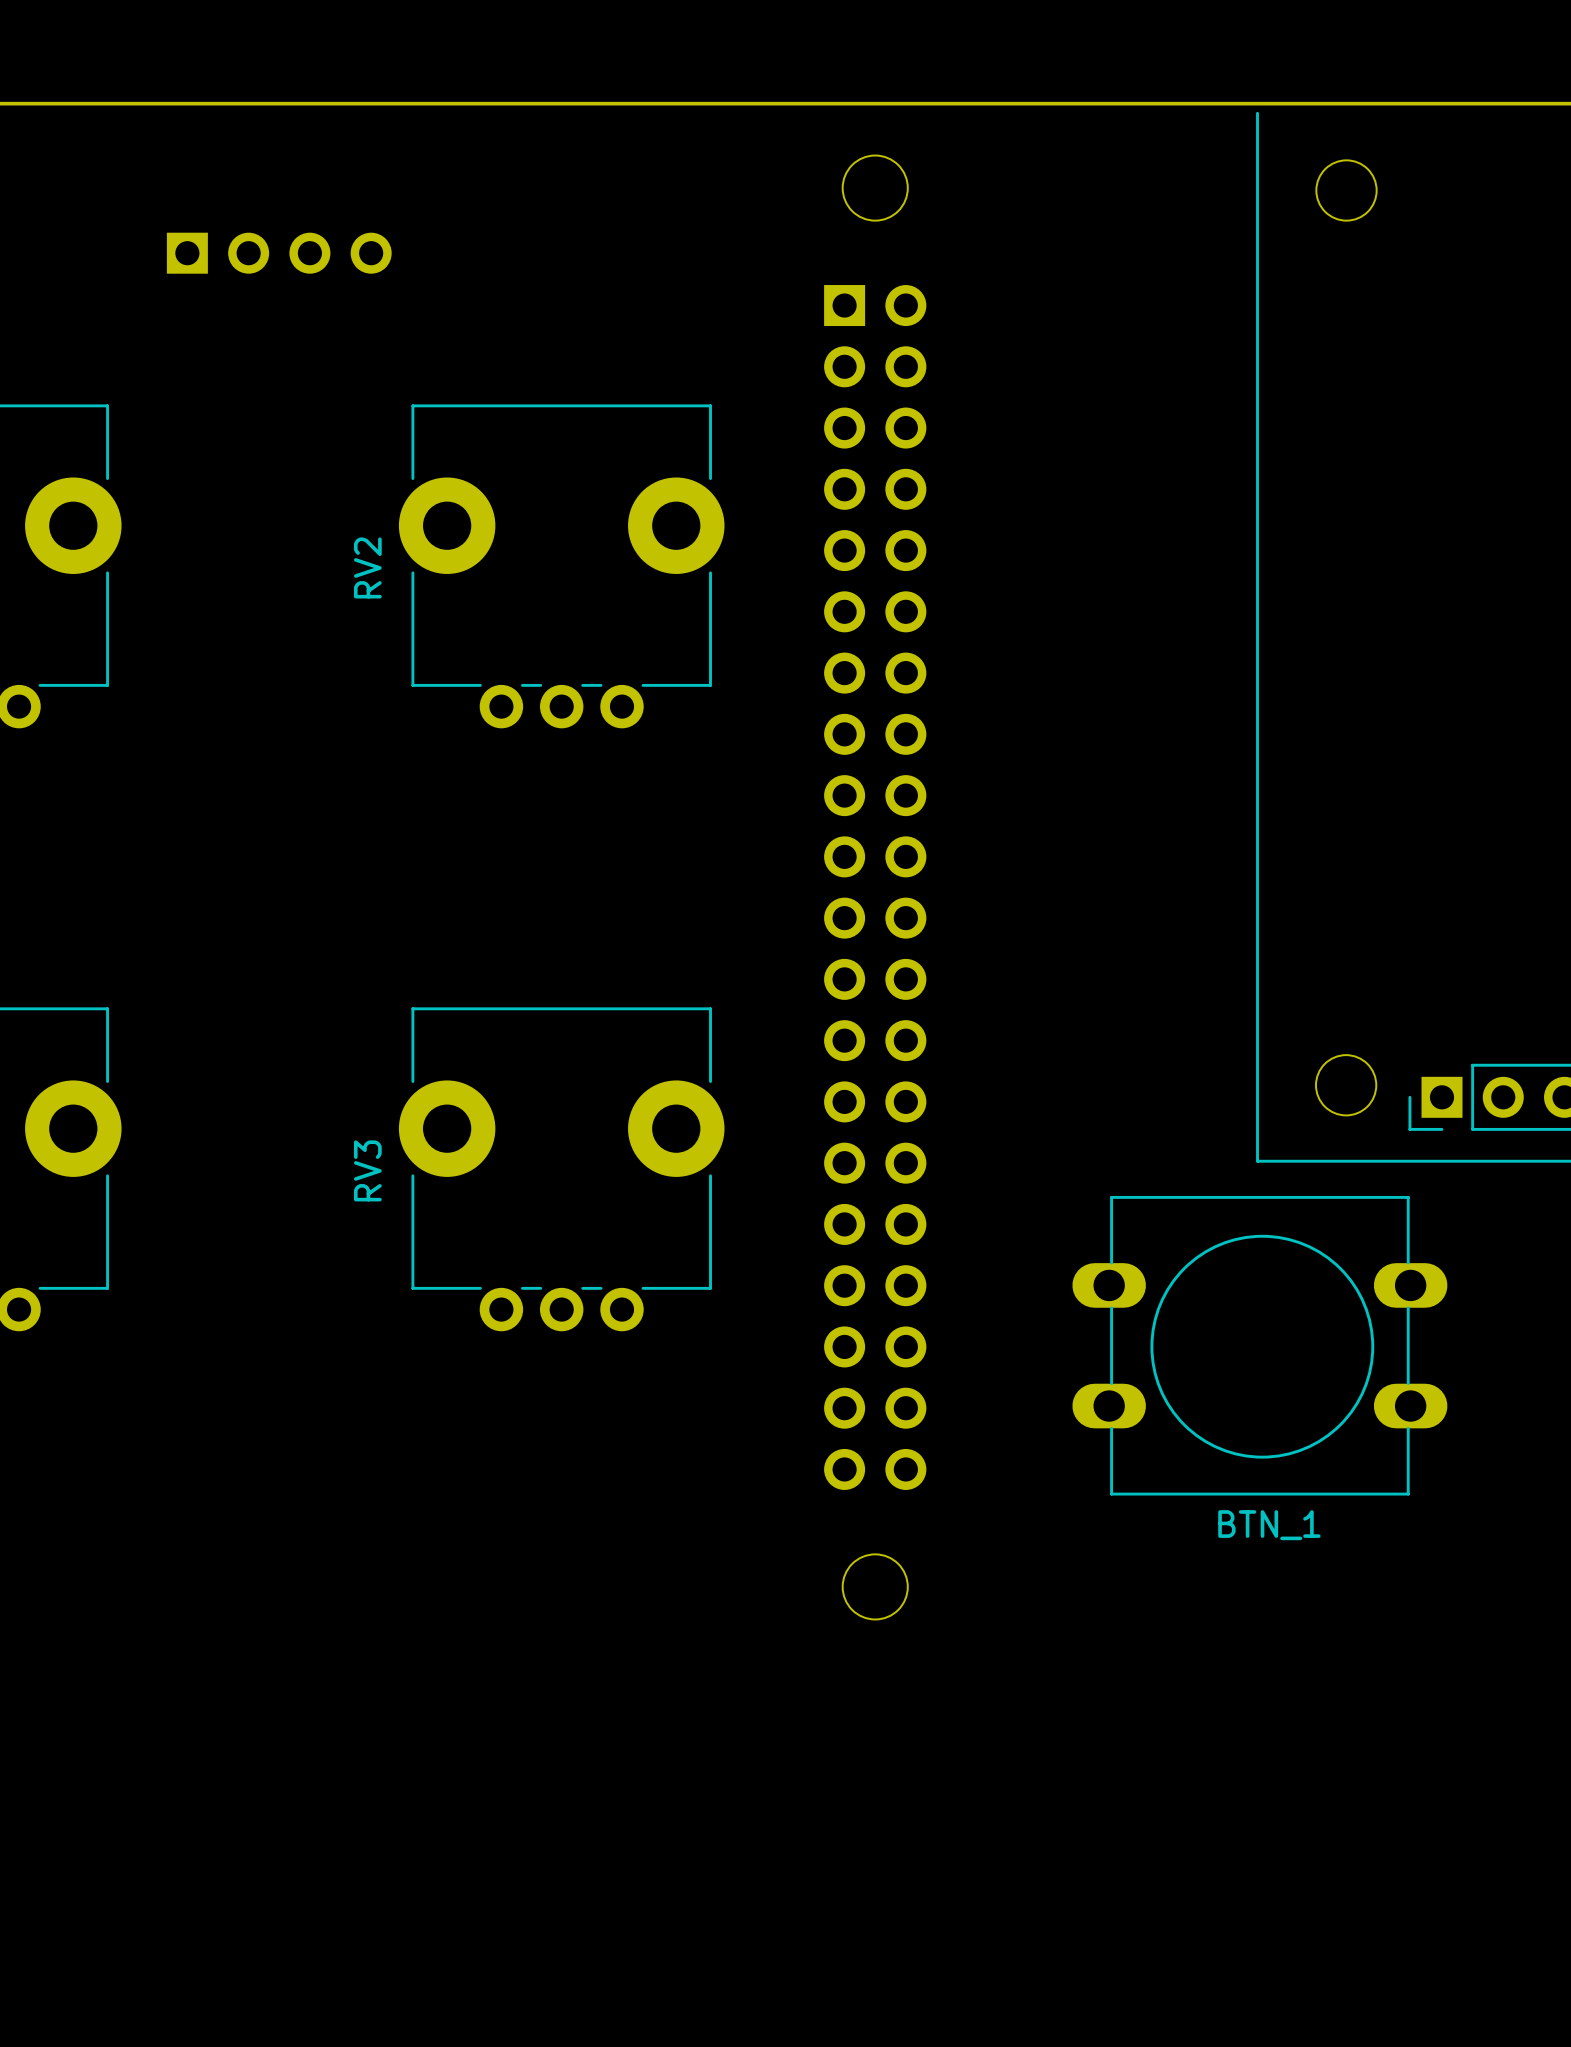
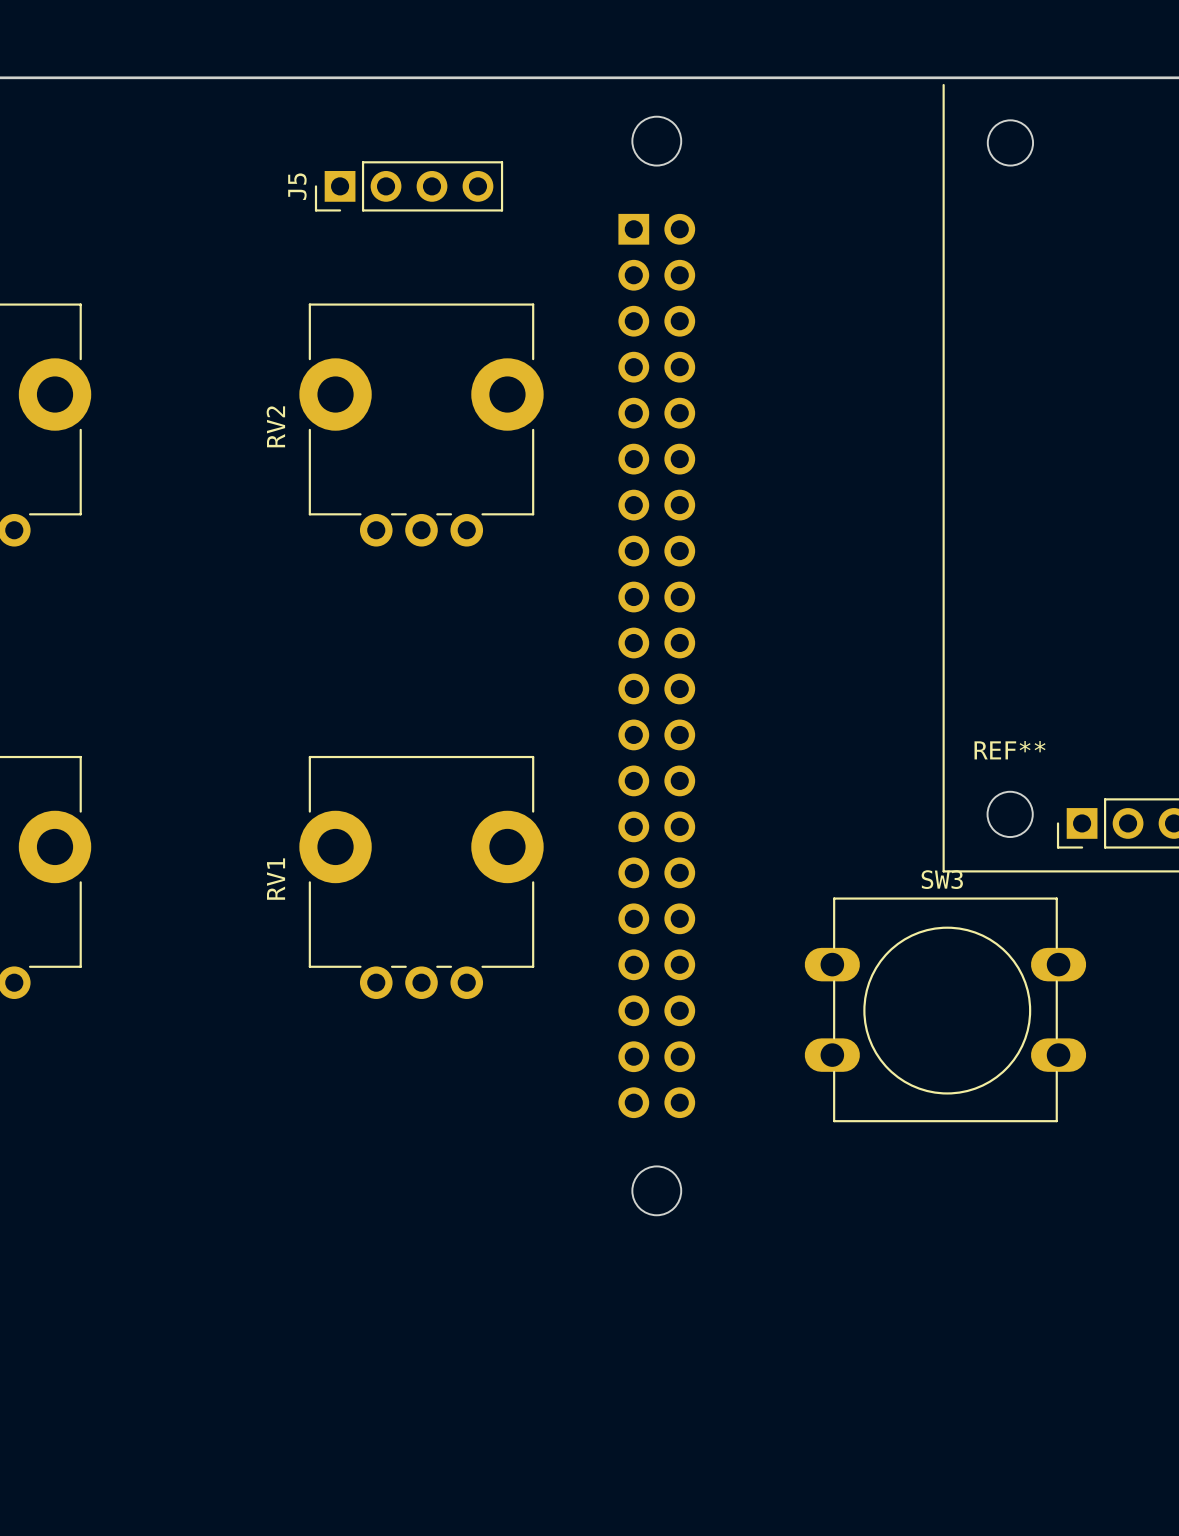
J5 side: bottom (279, 253) -> top (409, 186)
REF** name: none -> REF** (1010, 750)
RV3 name: RV3 (367, 1170) -> RV1 (276, 879)
SW3 name: none -> SW3 (942, 879)
SW3 value: BTN_1 (1269, 1525) -> none

